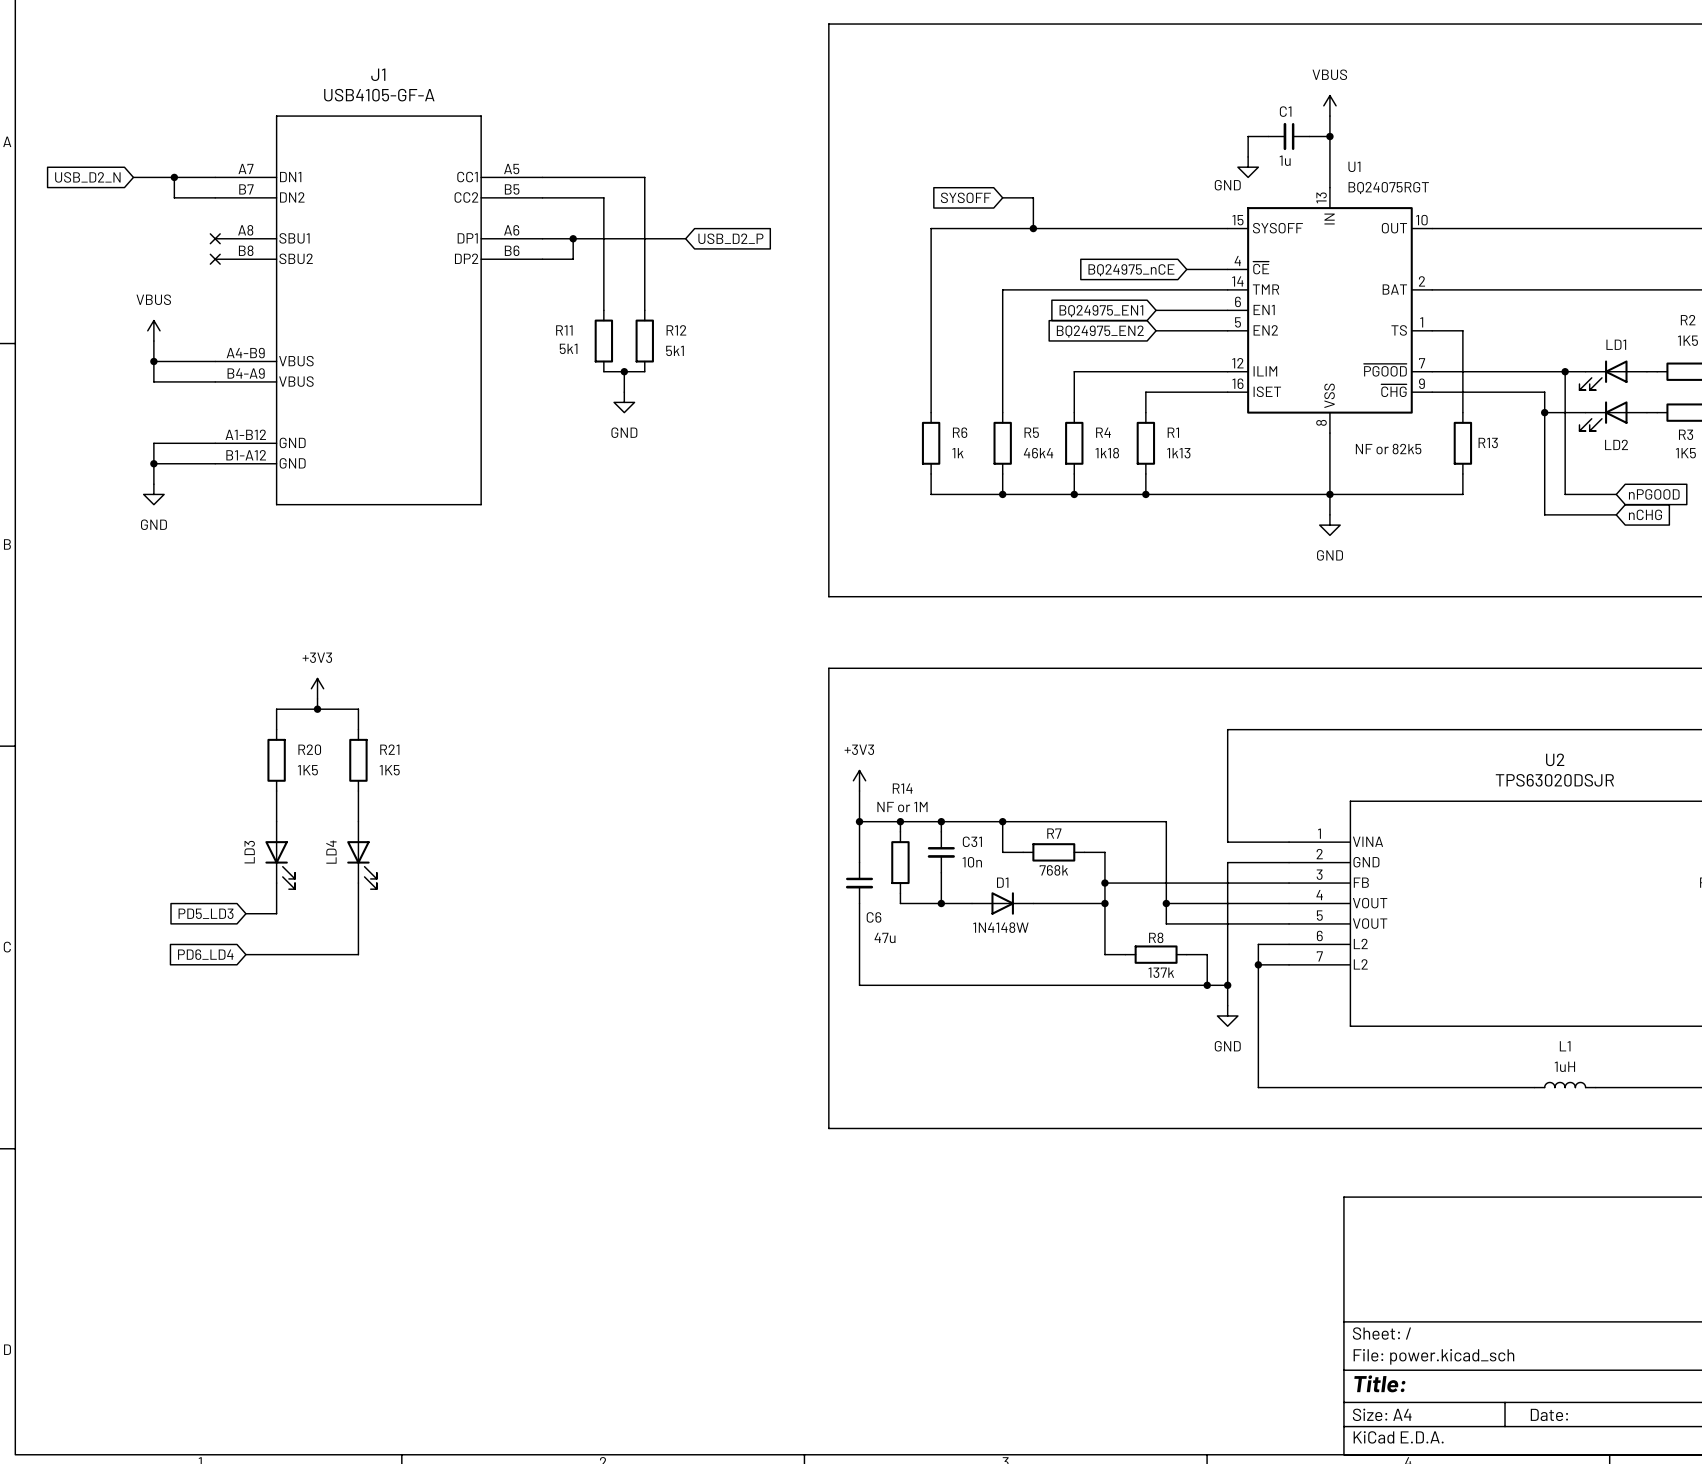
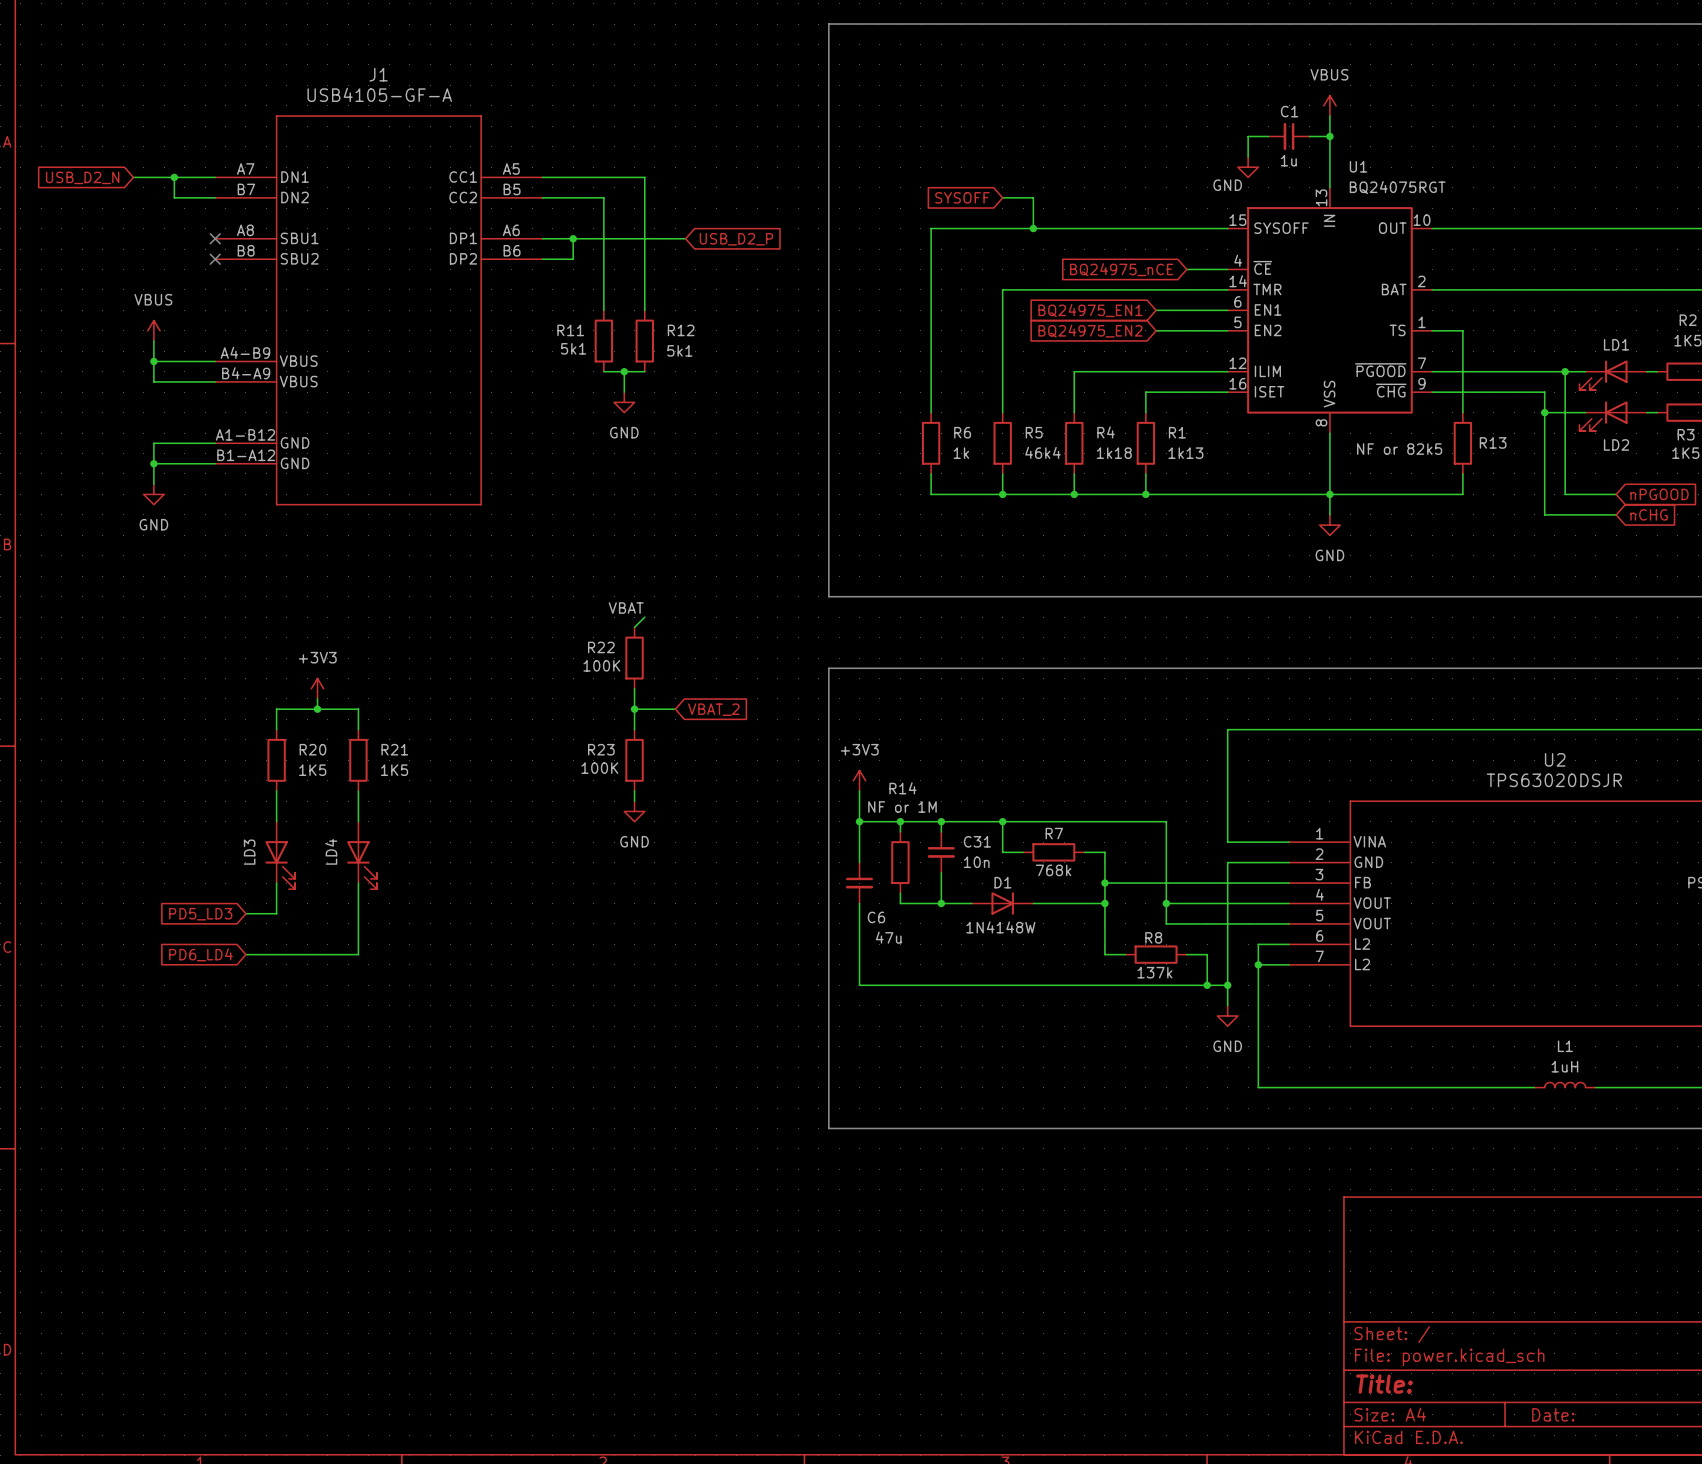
label: none -> VBAT (626, 608)
wire: none -> (644, 617) (634, 627)
R22: none -> 100K (634, 658)
wire: none -> (634, 688) (634, 729)
wire: none -> (634, 709) (675, 709)
junction: none -> (634, 709)
global label: none -> VBAT_2 (713, 709)
R23: none -> 100K (634, 760)
wire: none -> (634, 791) (634, 801)
power symbol: none -> GND (634, 811)

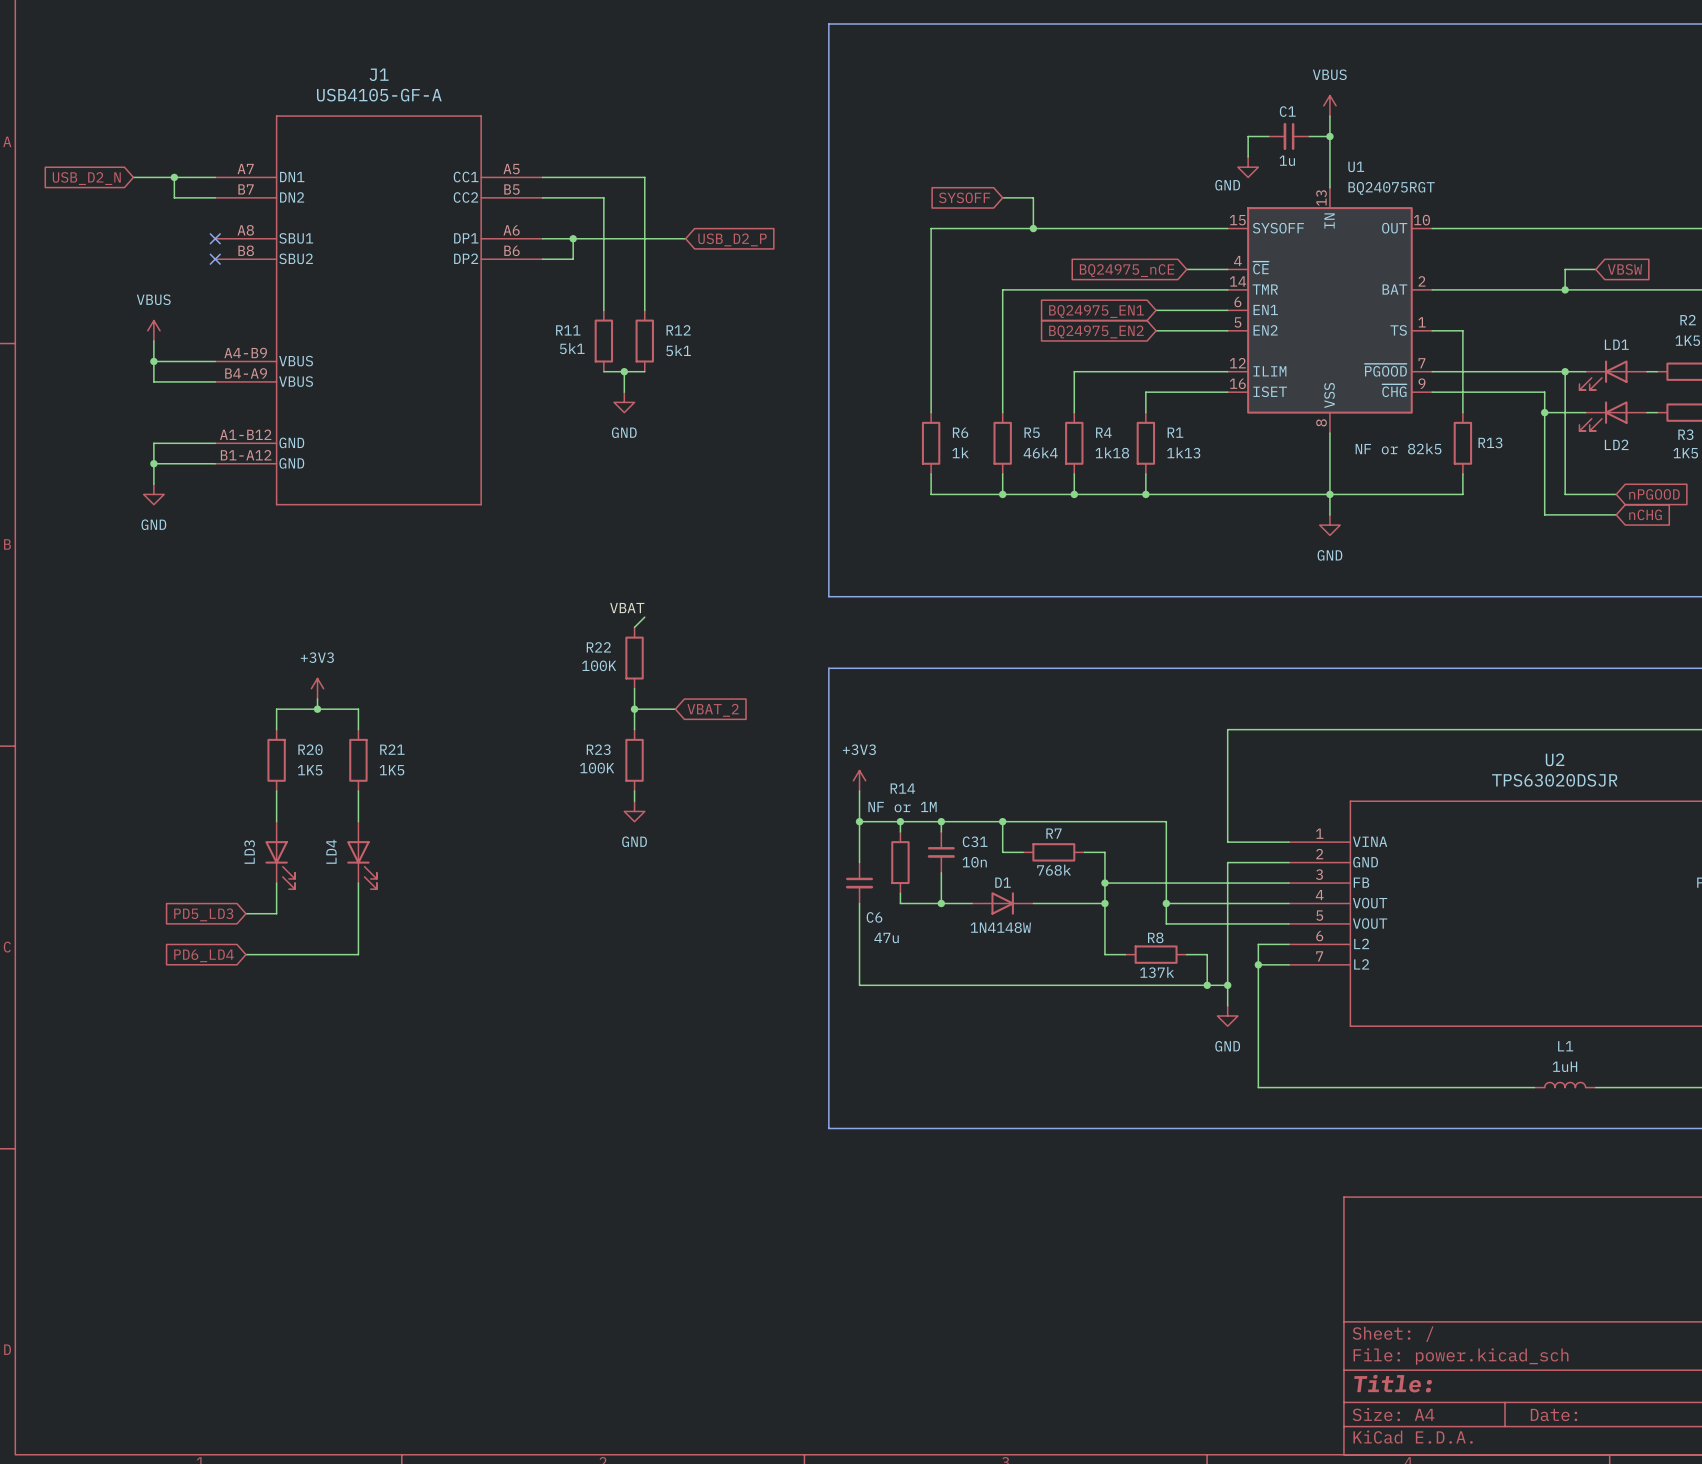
wire: none -> (1595, 269) (1565, 269) (1565, 289)
global label: none -> VBSW (1624, 269)
junction: none -> (1565, 289)

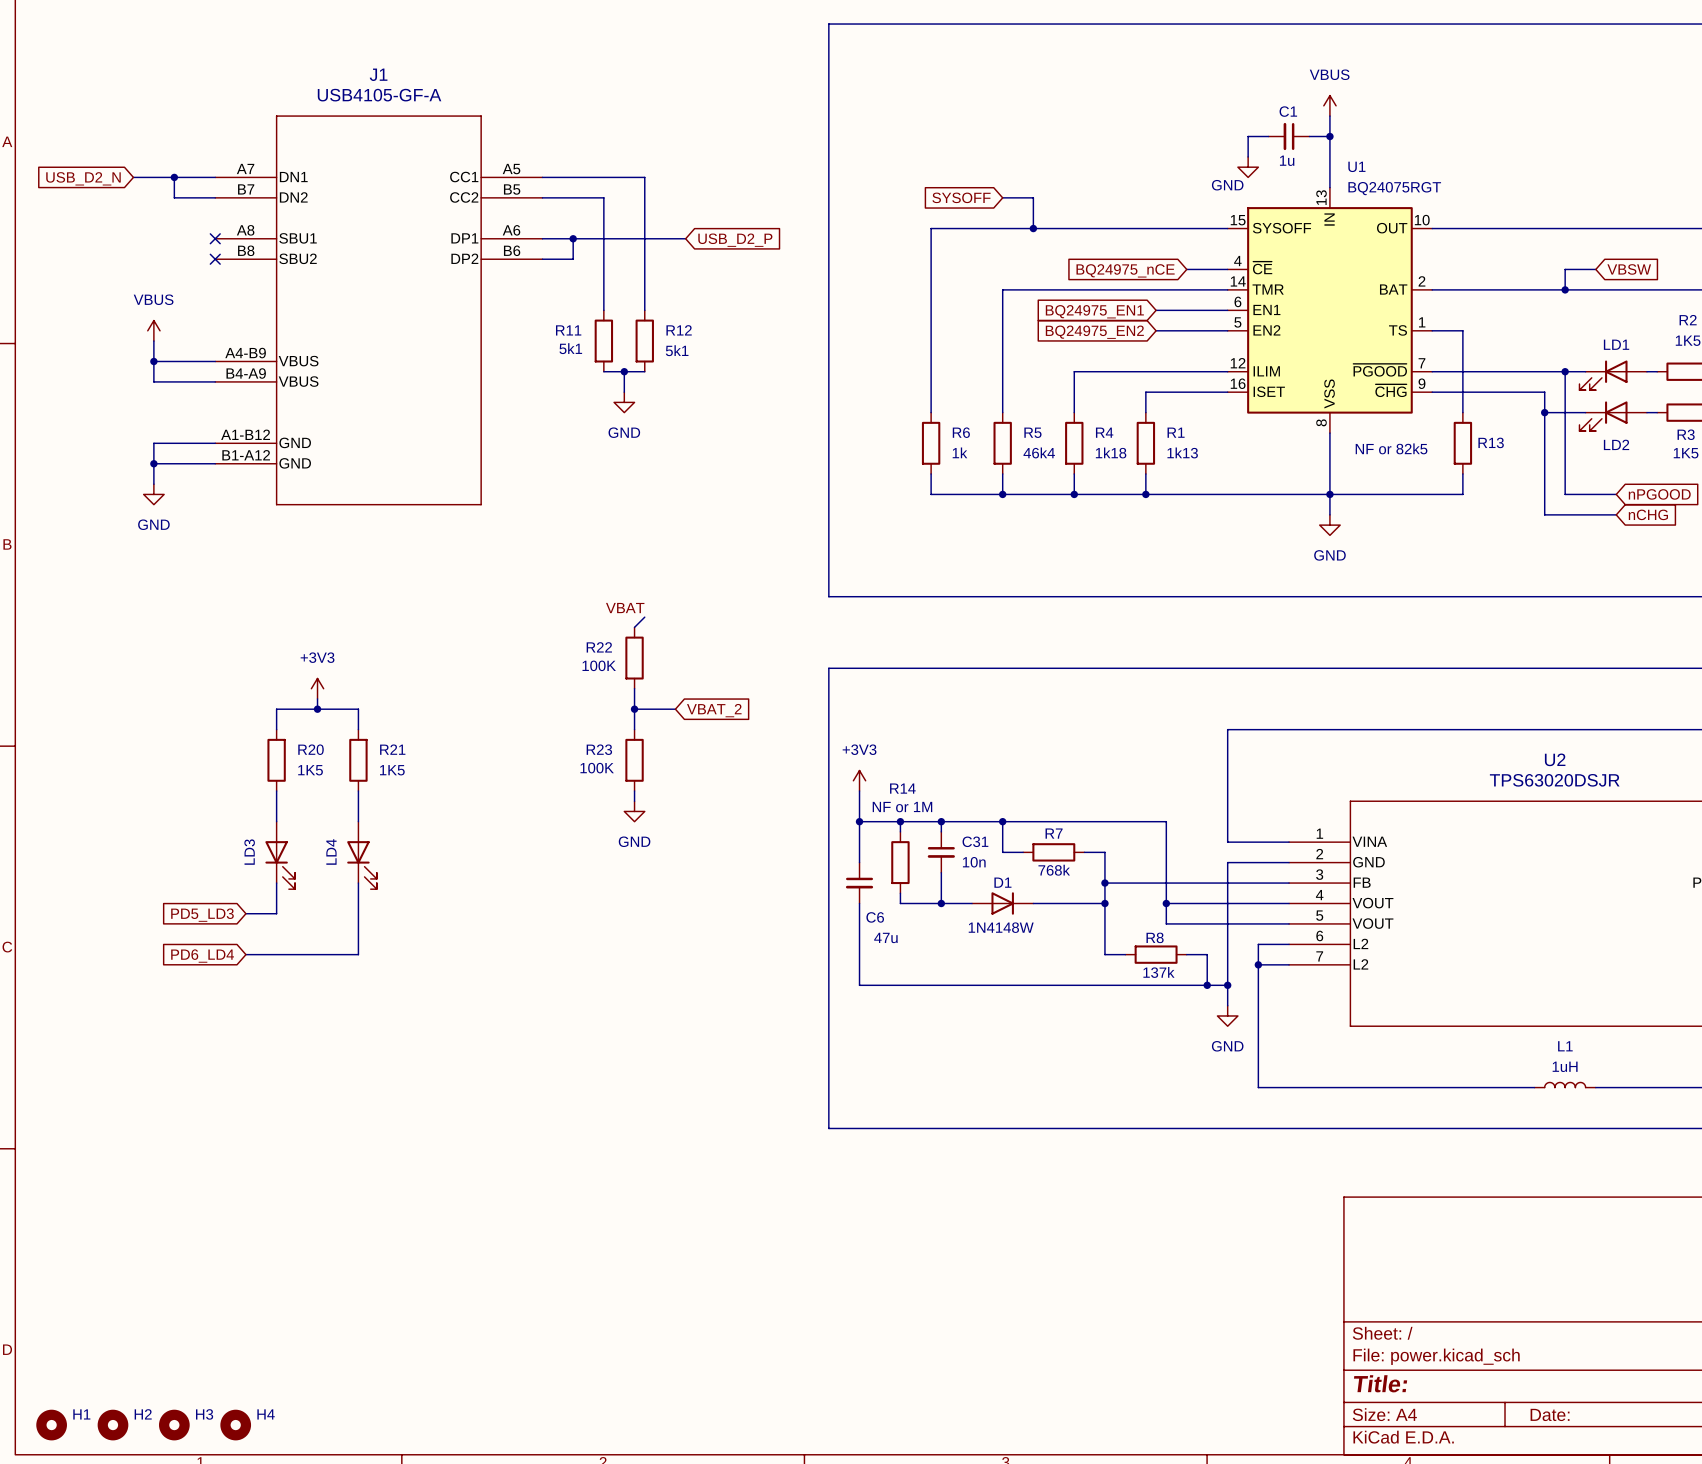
H1: none -> (51, 1425)
H2: none -> (112, 1425)
H3: none -> (174, 1425)
H4: none -> (235, 1425)

